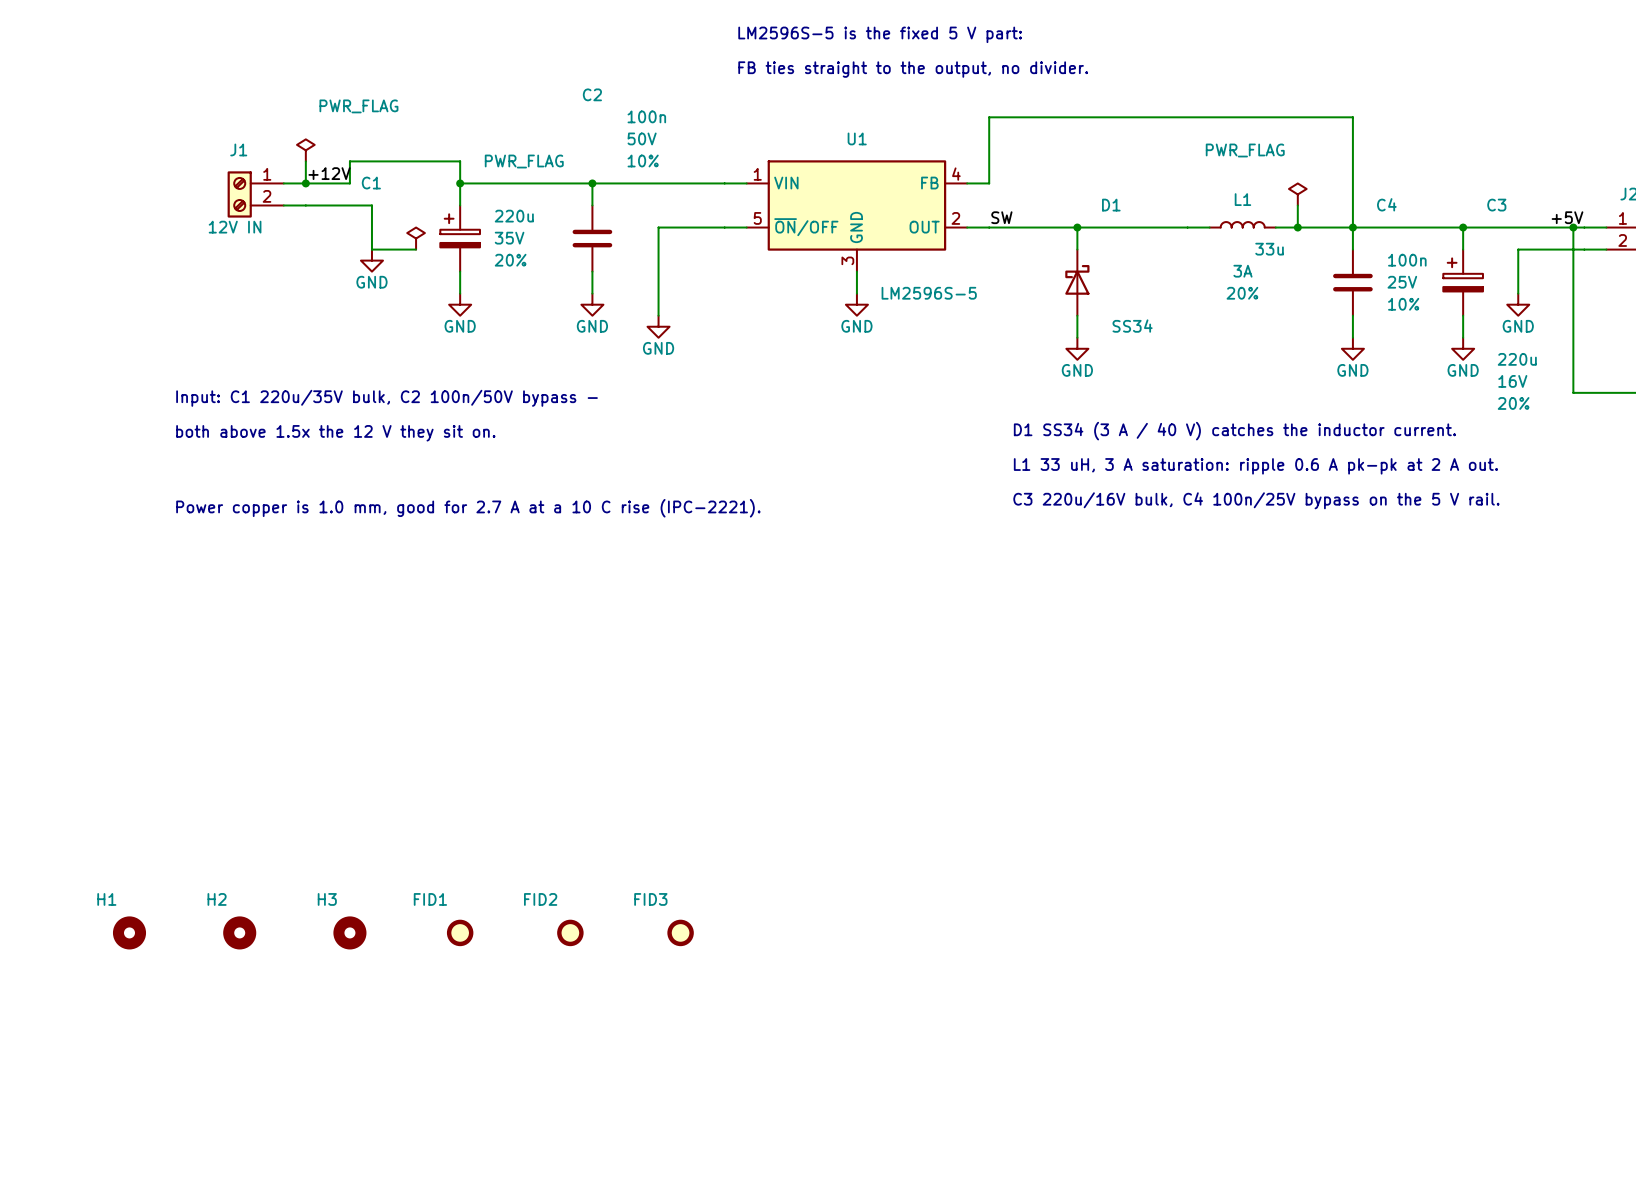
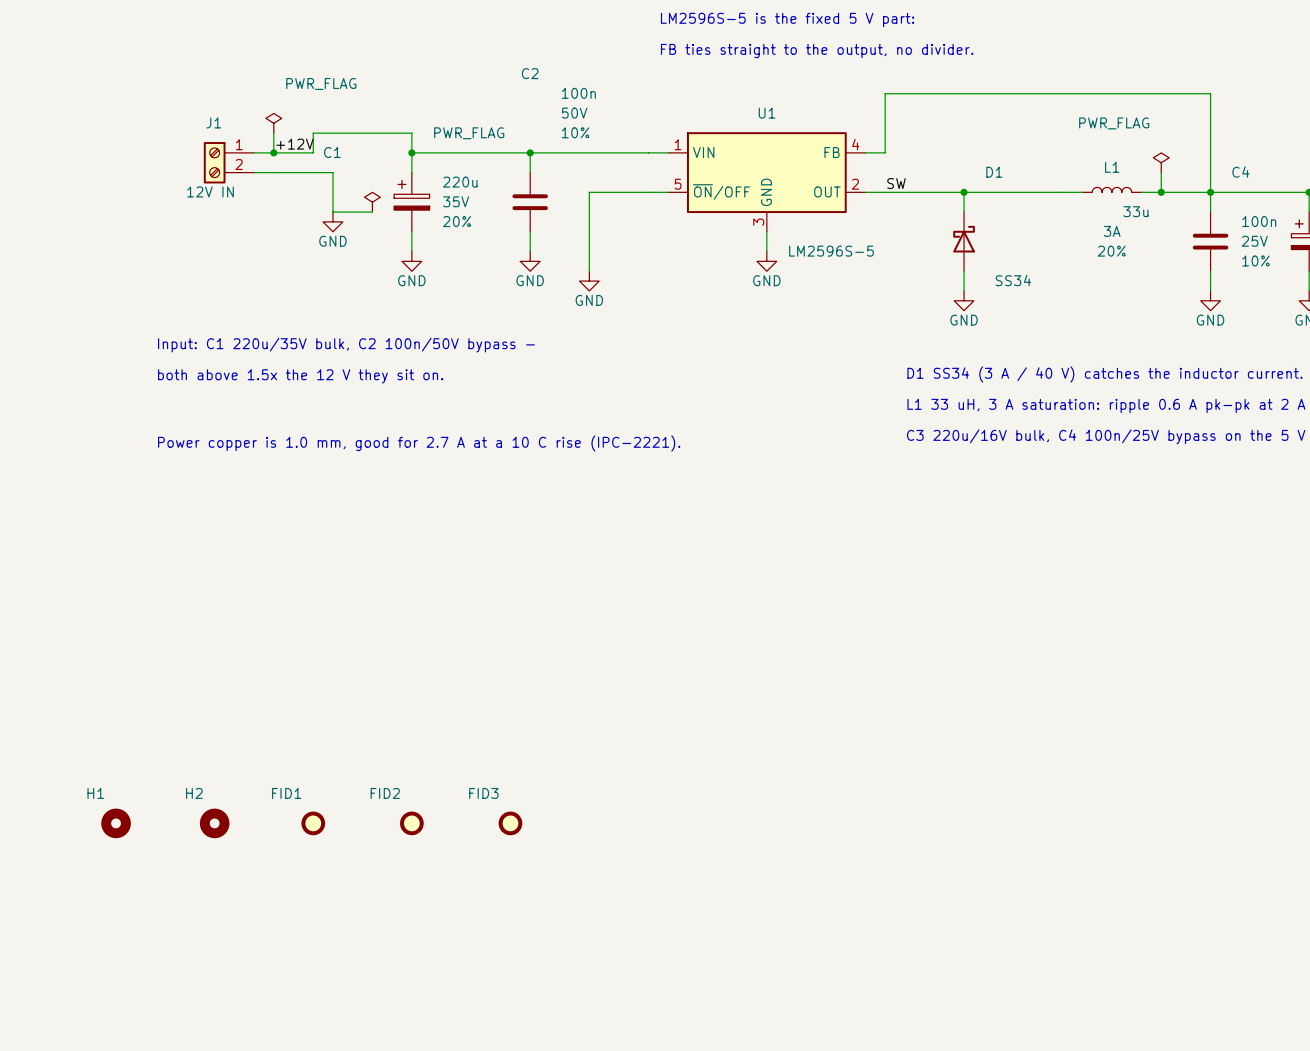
FID1 name: FID1 (430, 899) -> FID2 (385, 793)
FID2 name: FID2 (540, 899) -> FID3 (483, 793)
H3: (349, 932) -> none
FID1: none -> (313, 823)
FID3: (680, 932) -> none

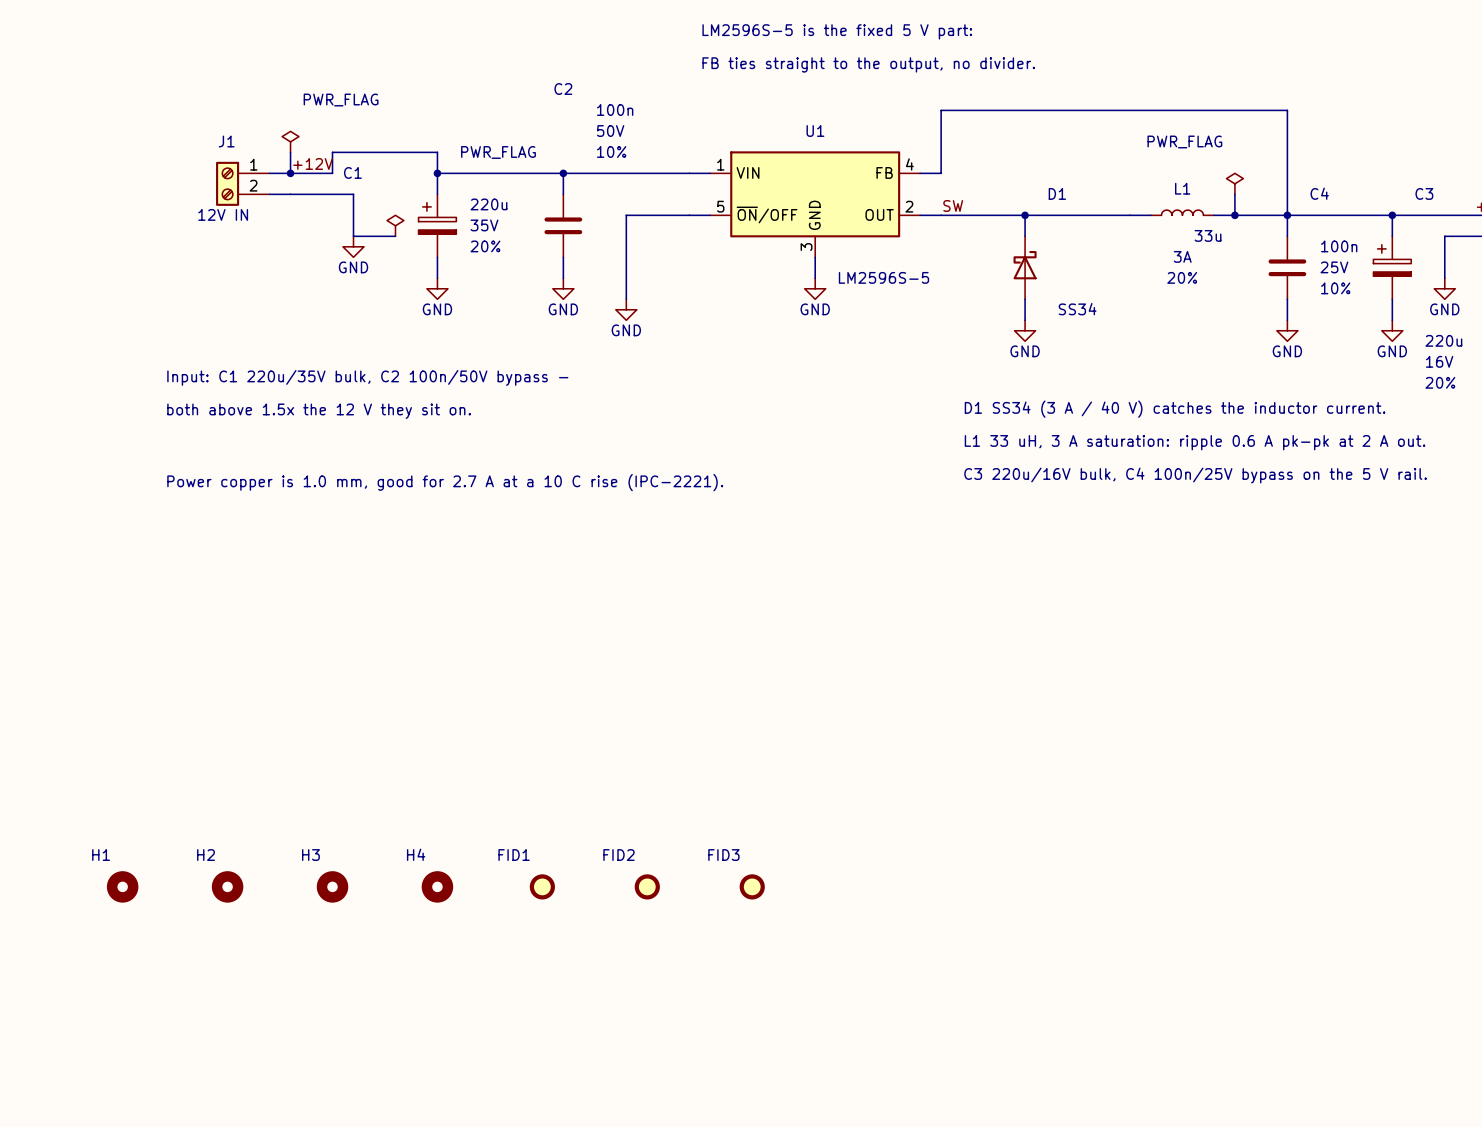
FID3 name: FID3 (483, 793) -> FID1 (514, 855)
FID1: (313, 823) -> none
H3: none -> (332, 886)
FID2 position: (411, 823) -> (647, 886)
H4: none -> (437, 886)
FID3: none -> (752, 886)

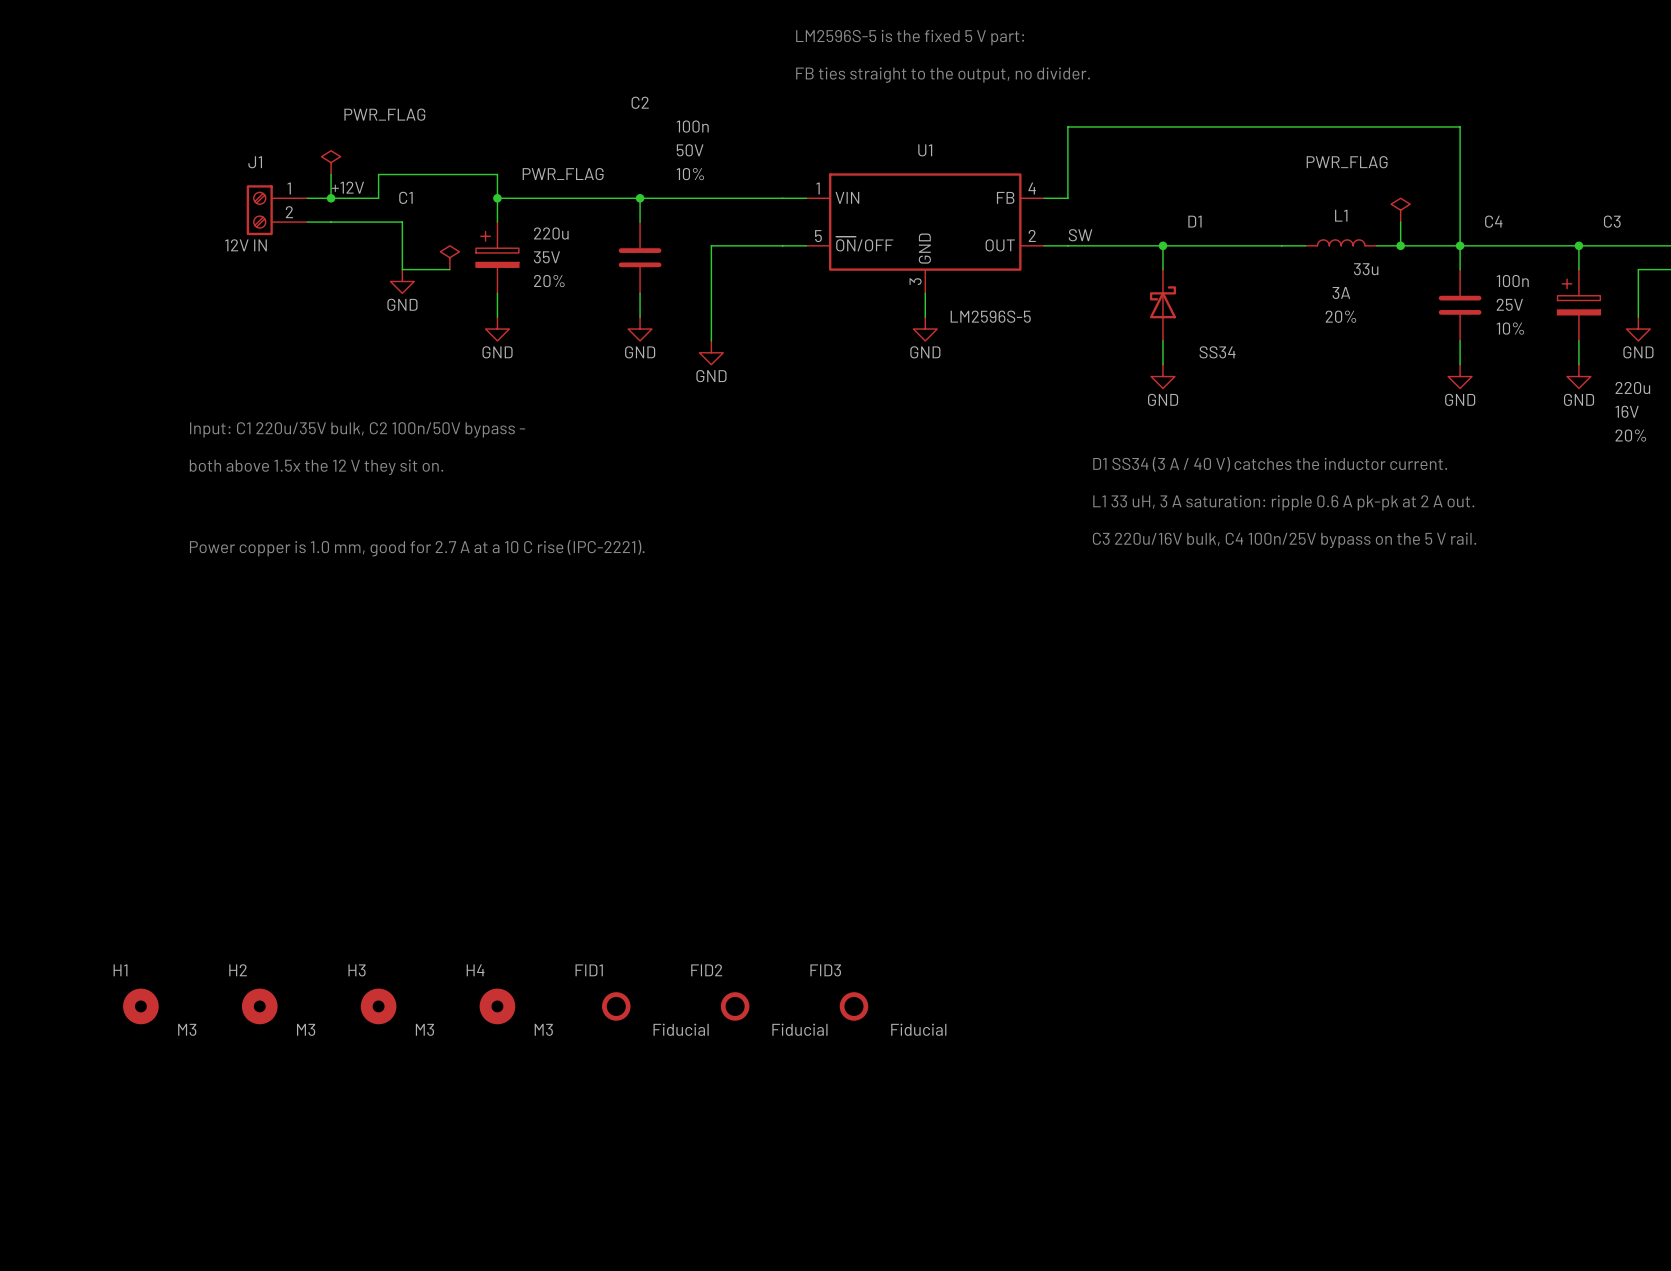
H1 value: none -> M3 (187, 1029)
H2 value: none -> M3 (306, 1029)
H3 value: none -> M3 (424, 1029)
H4 value: none -> M3 (543, 1029)
FID1 value: none -> Fiducial (681, 1029)
FID2 value: none -> Fiducial (799, 1029)
FID3 value: none -> Fiducial (918, 1029)

